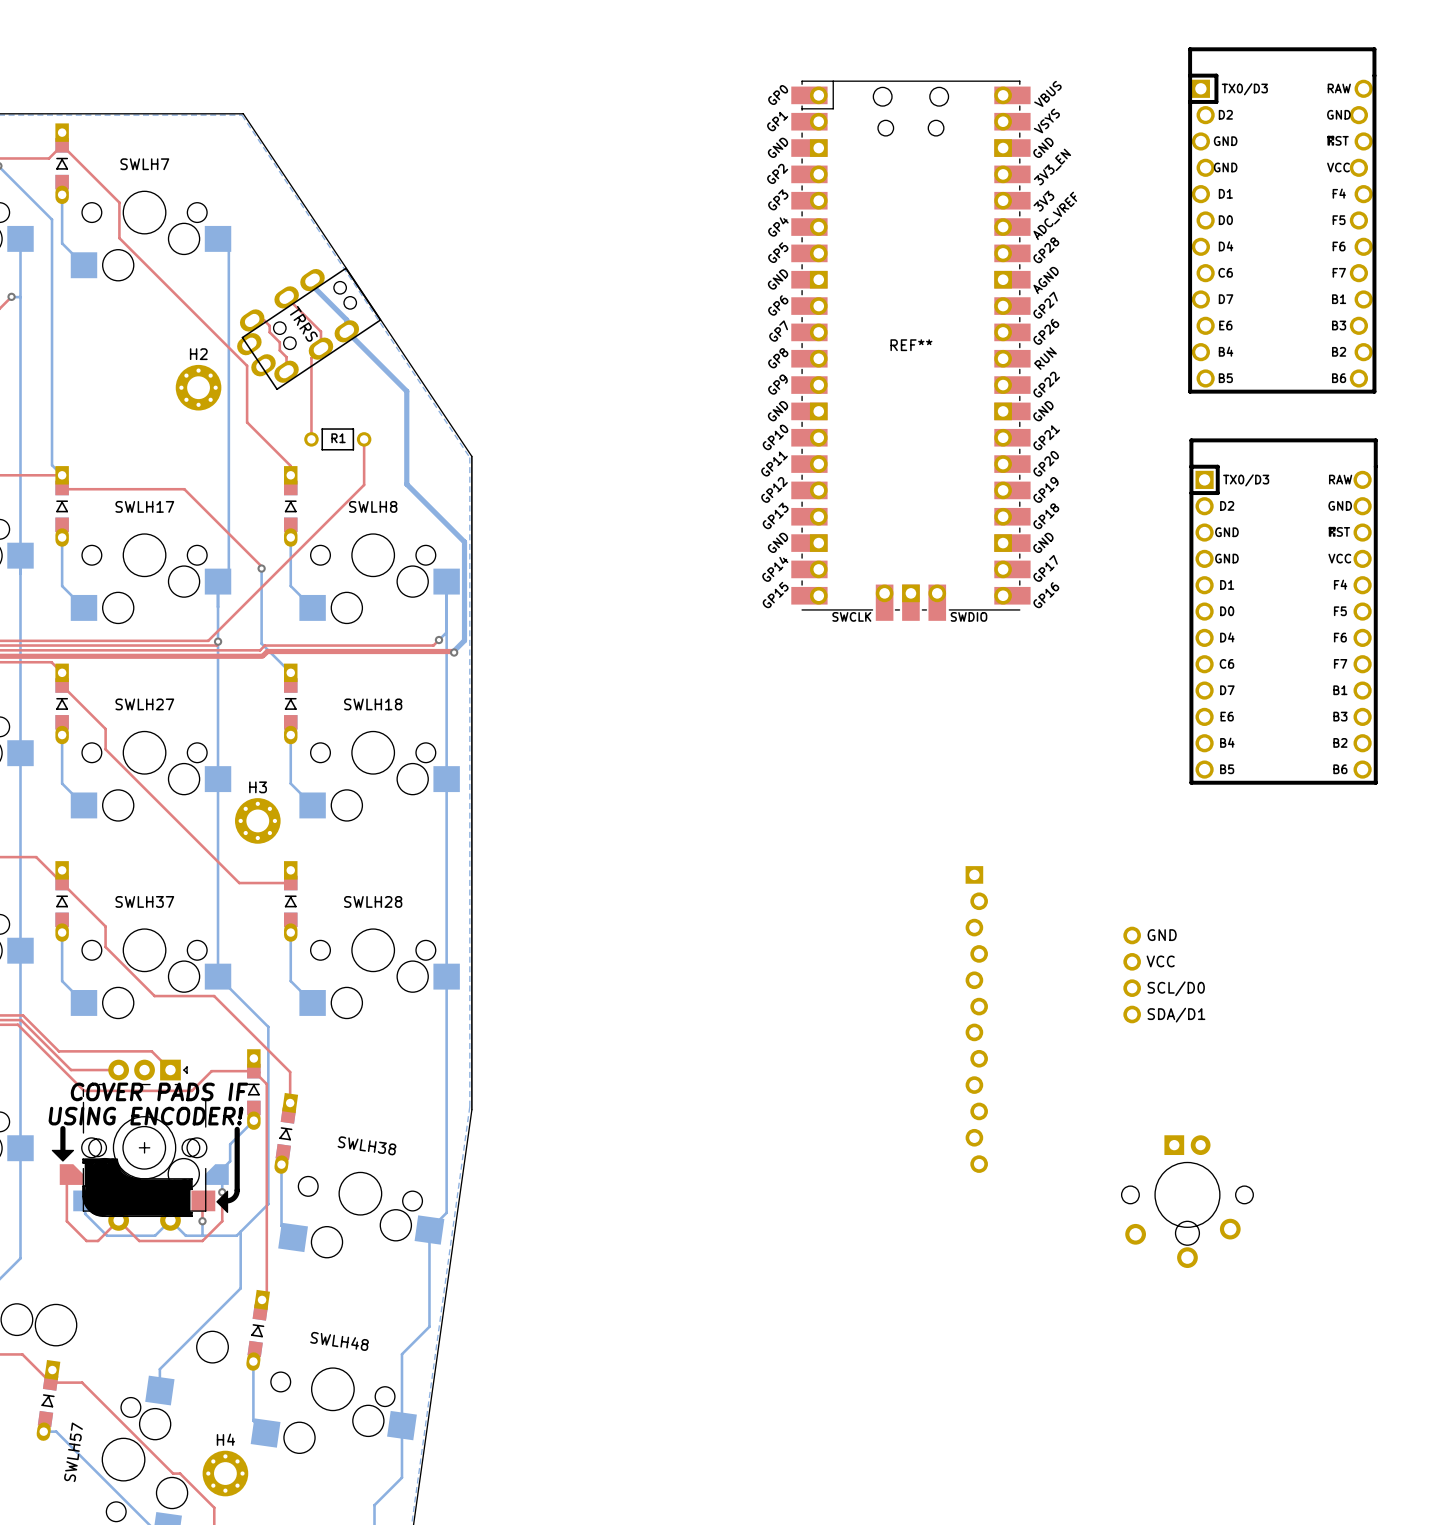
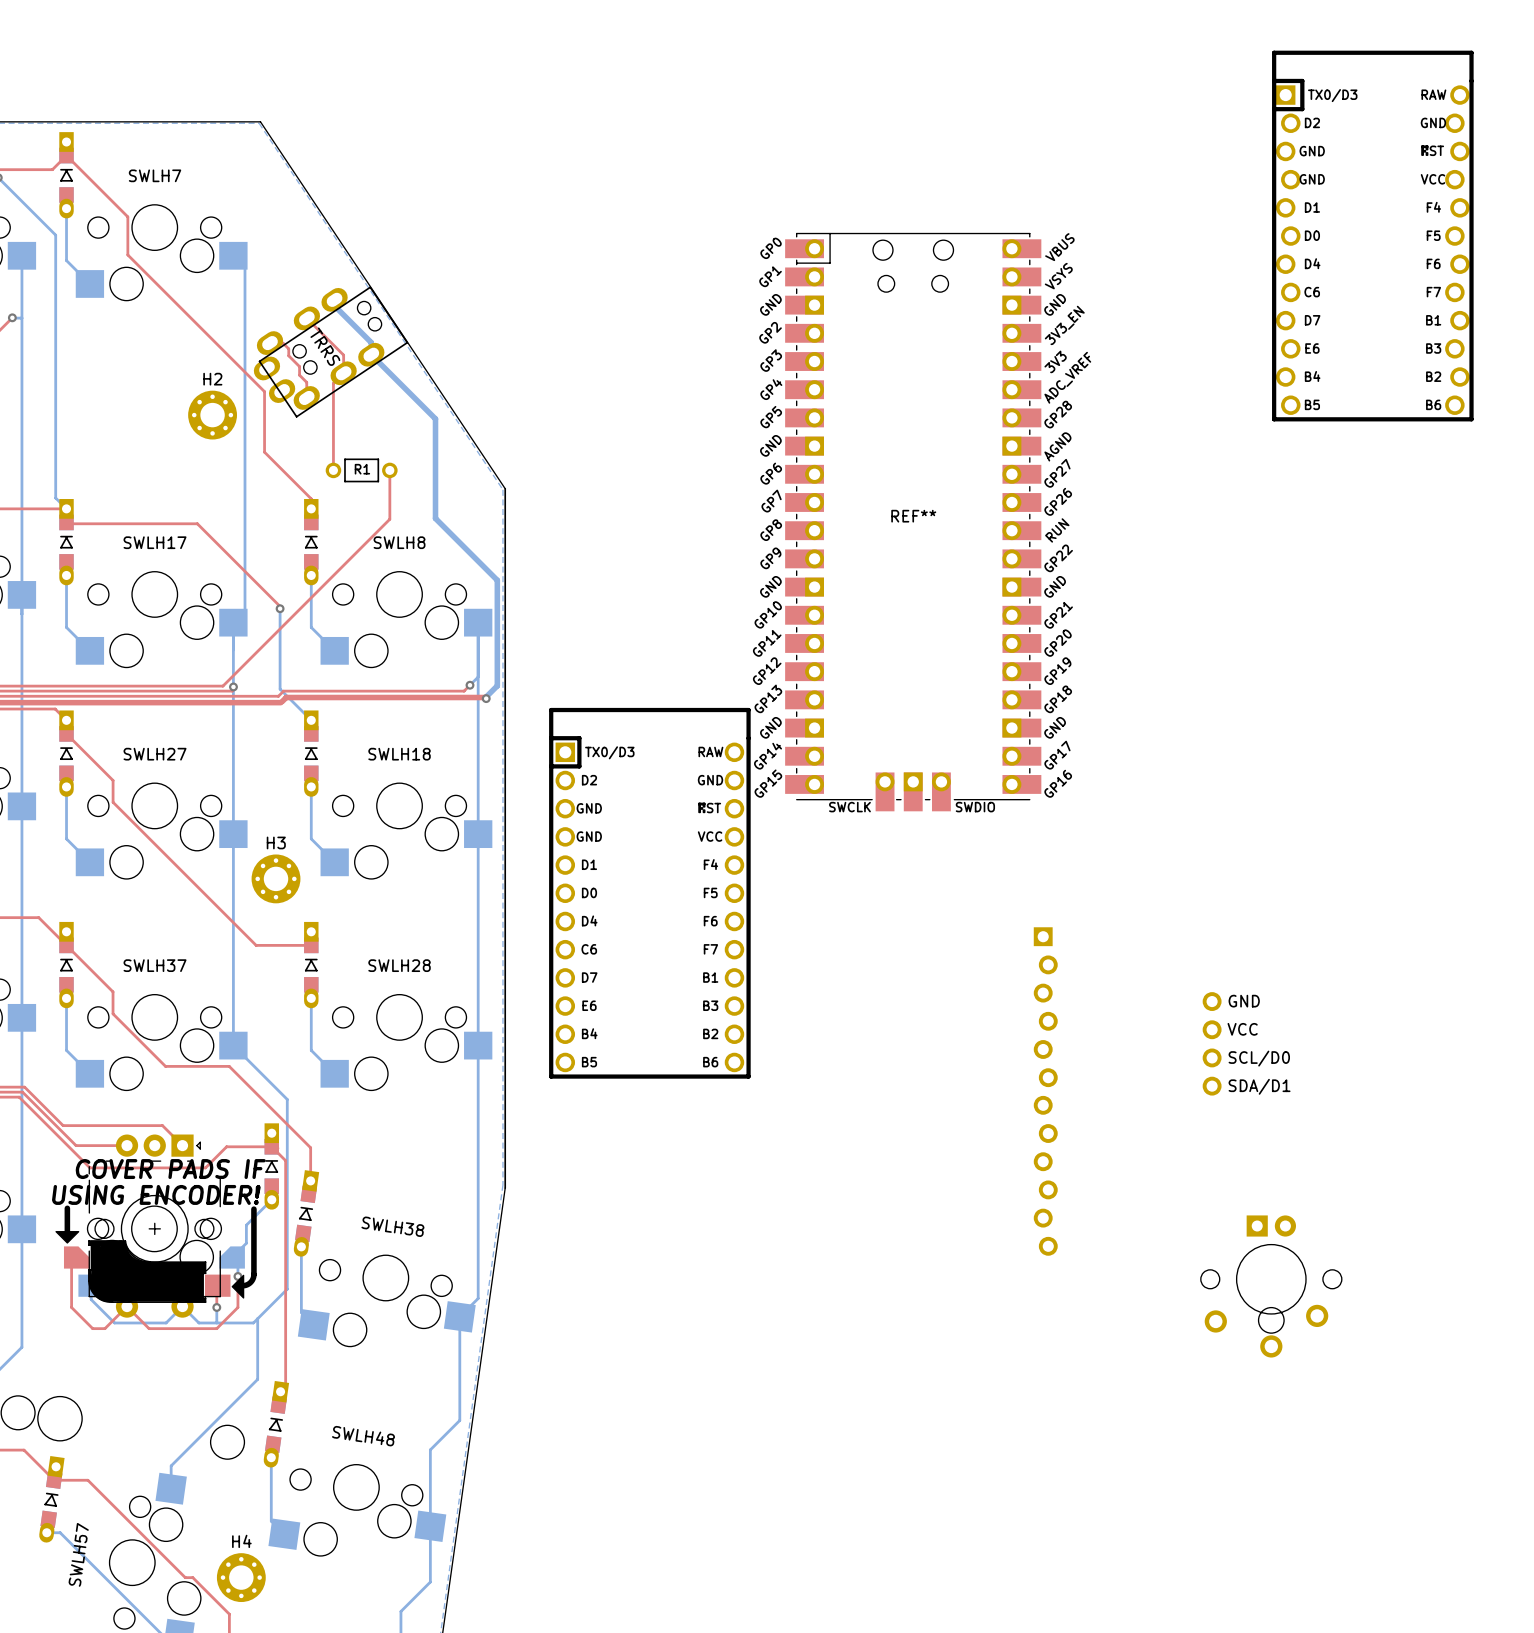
REF** position: (910, 350) -> (913, 522)
part: (1283, 611) -> none
part: none -> (649, 893)

